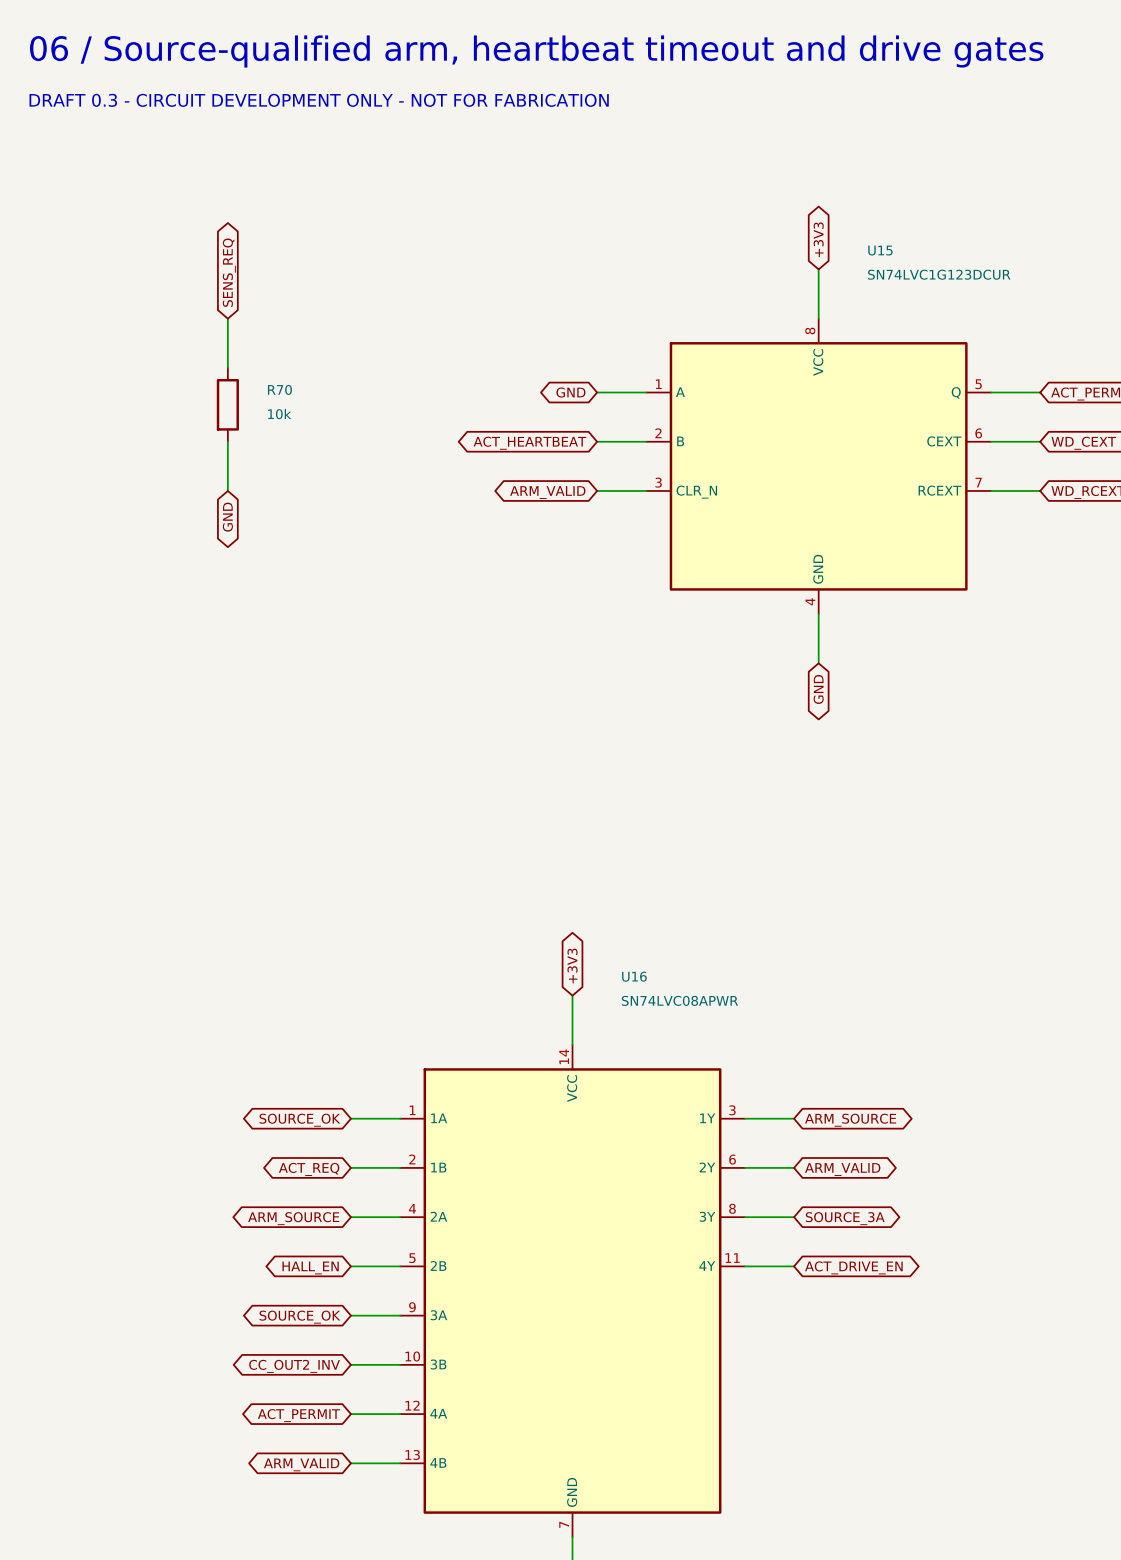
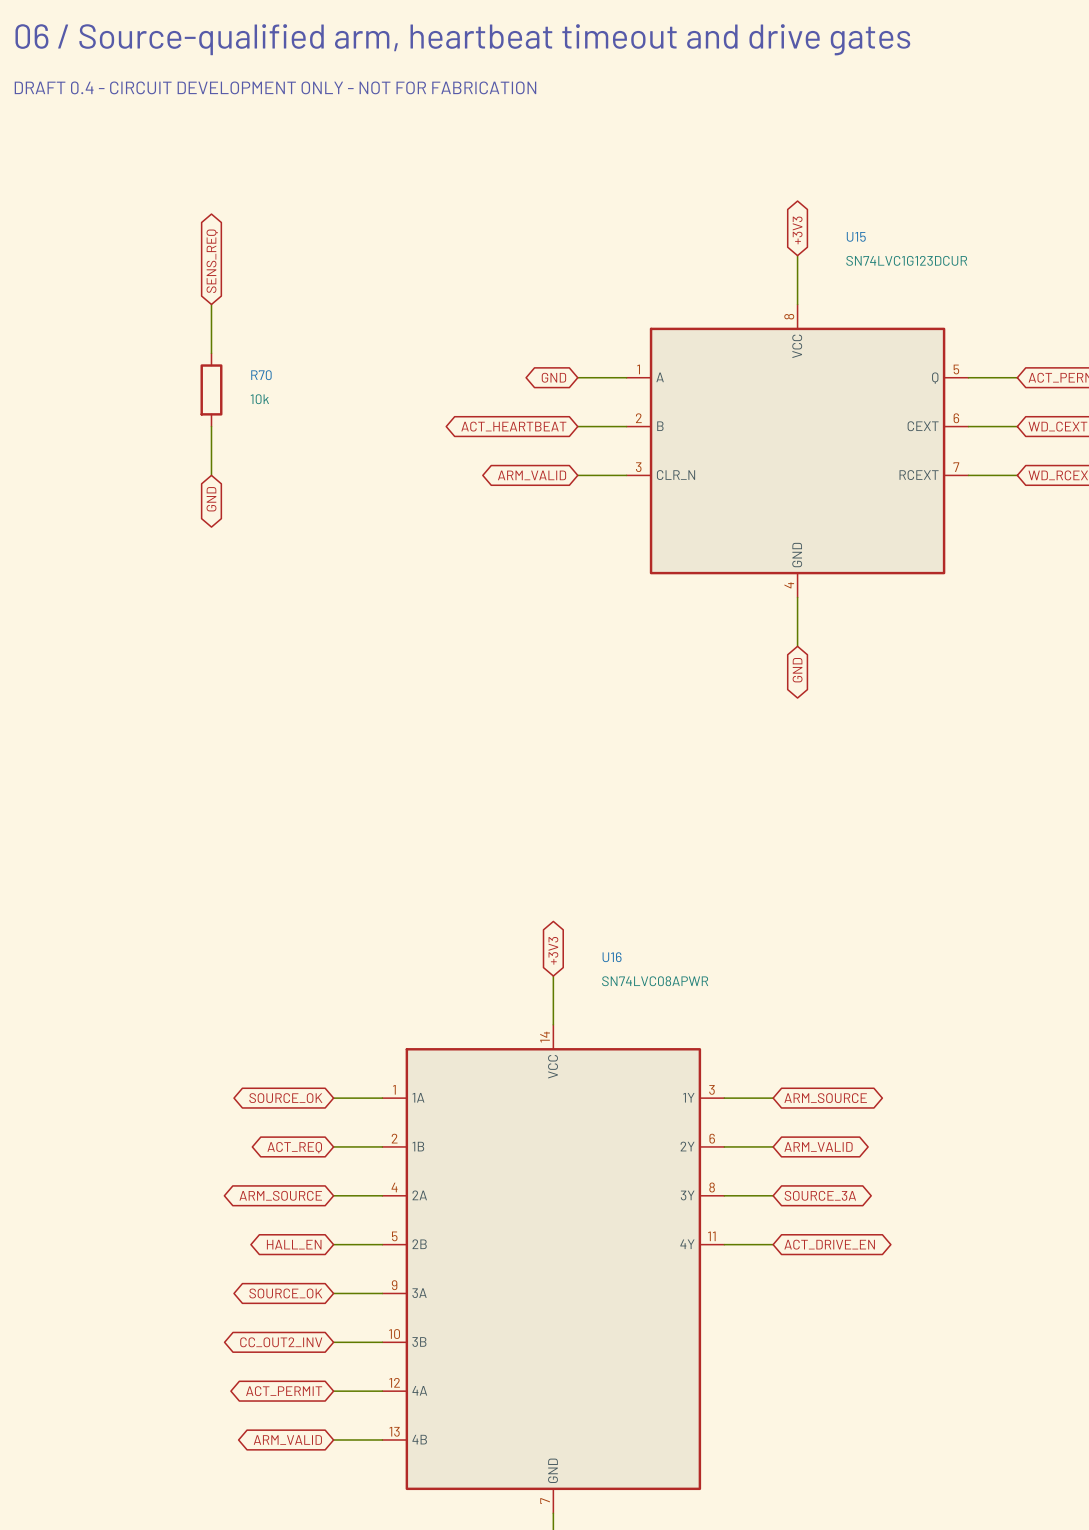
text: DRAFT 0.3 - CIRCUIT DEVELOPMENT ONLY - NOT FOR FABRICATION (319, 100) -> DRAFT 0.4 - CIRCUIT DEVELOPMENT ONLY - NOT FOR FABRICATION (275, 87)

